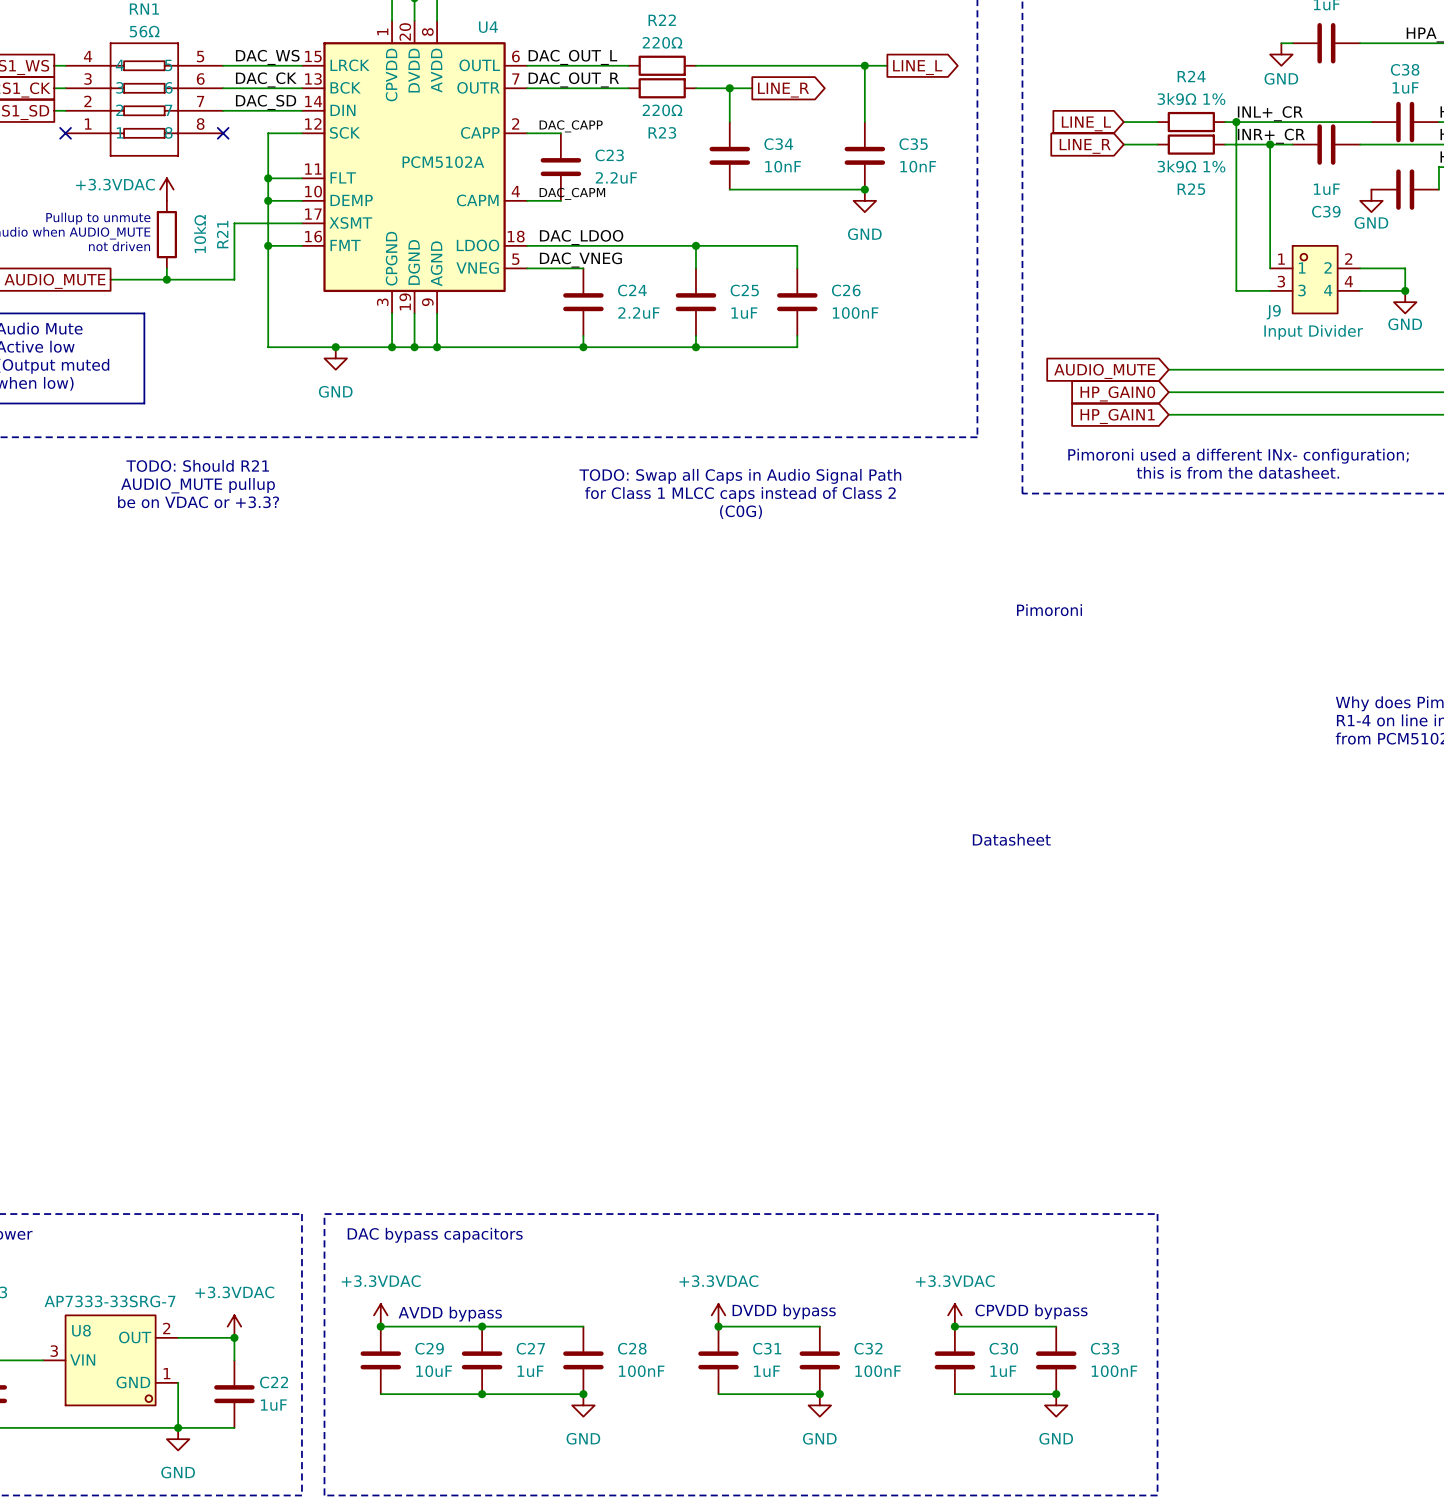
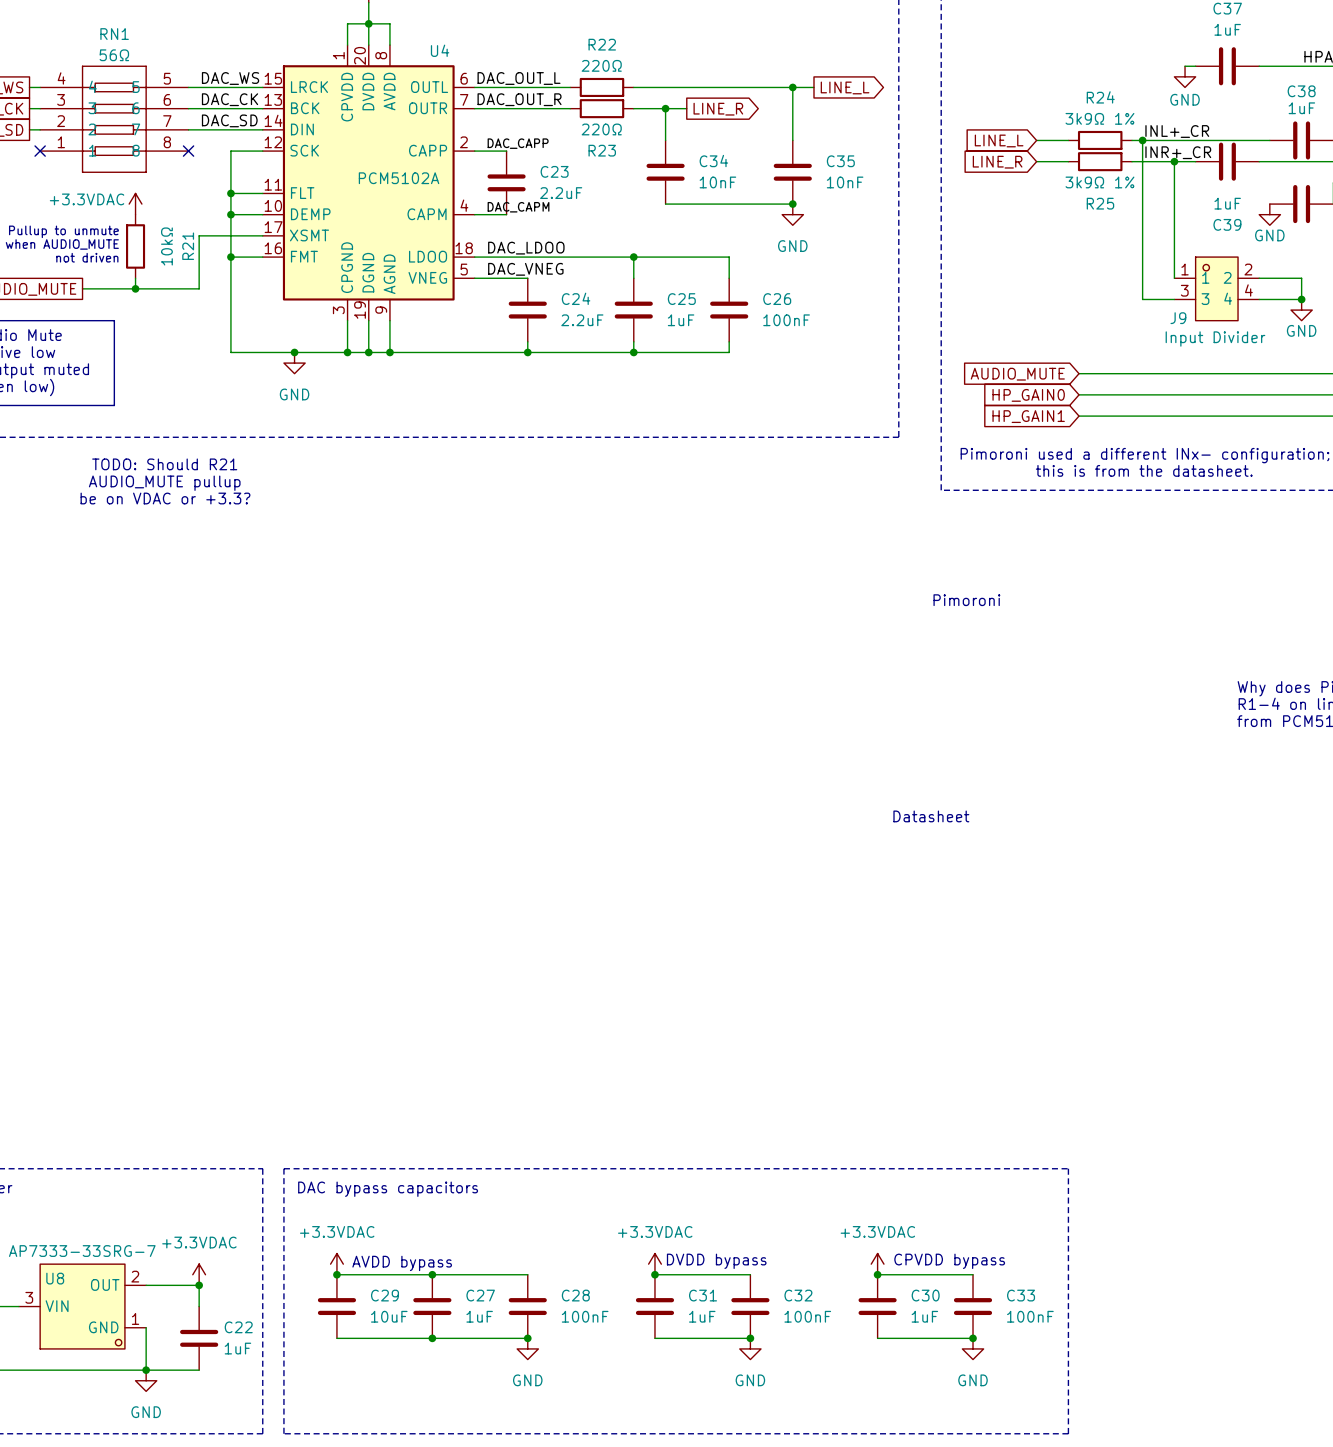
text: TODO: Swap all Caps in Audio Signal Path (740, 476) -> none
text: for Class 1 MLCC caps instead of Class 2 (740, 494) -> none
text: (C0G) (741, 512) -> none

